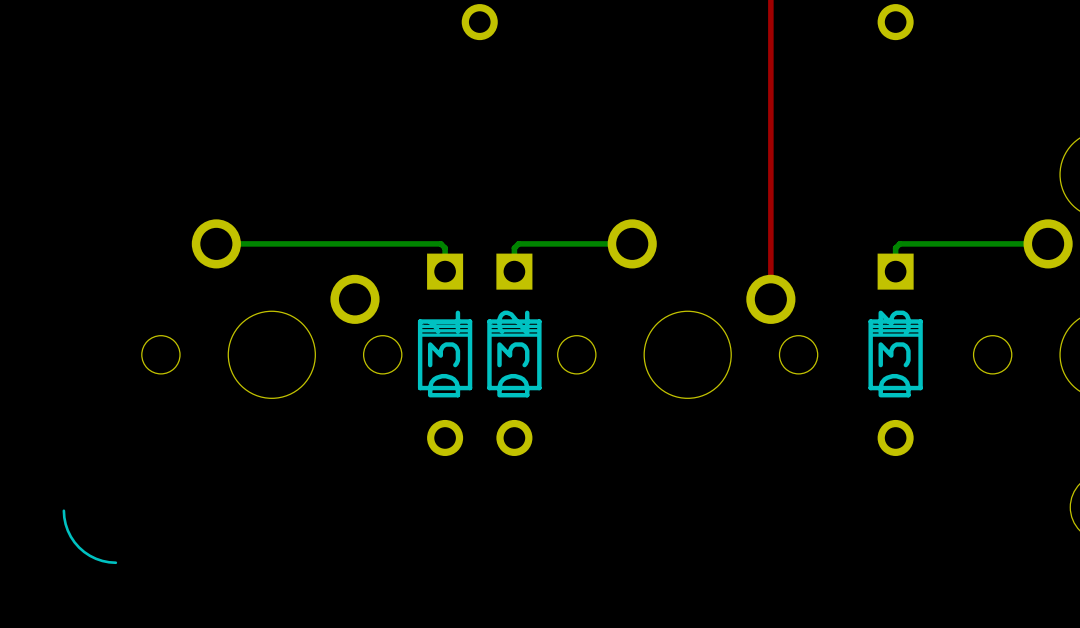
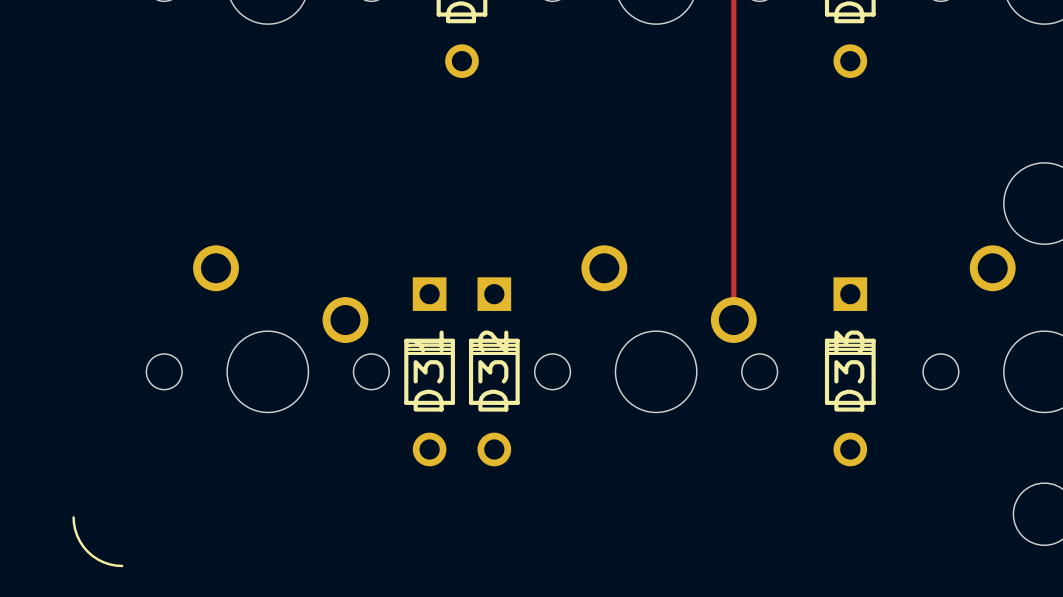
bottom track: (216, 243) (440, 243) (445, 248) (445, 271) -> none
bottom track: (632, 243) (518, 243) (514, 248) (514, 271) -> none
bottom track: (1048, 243) (899, 243) (895, 248) (895, 271) -> none

